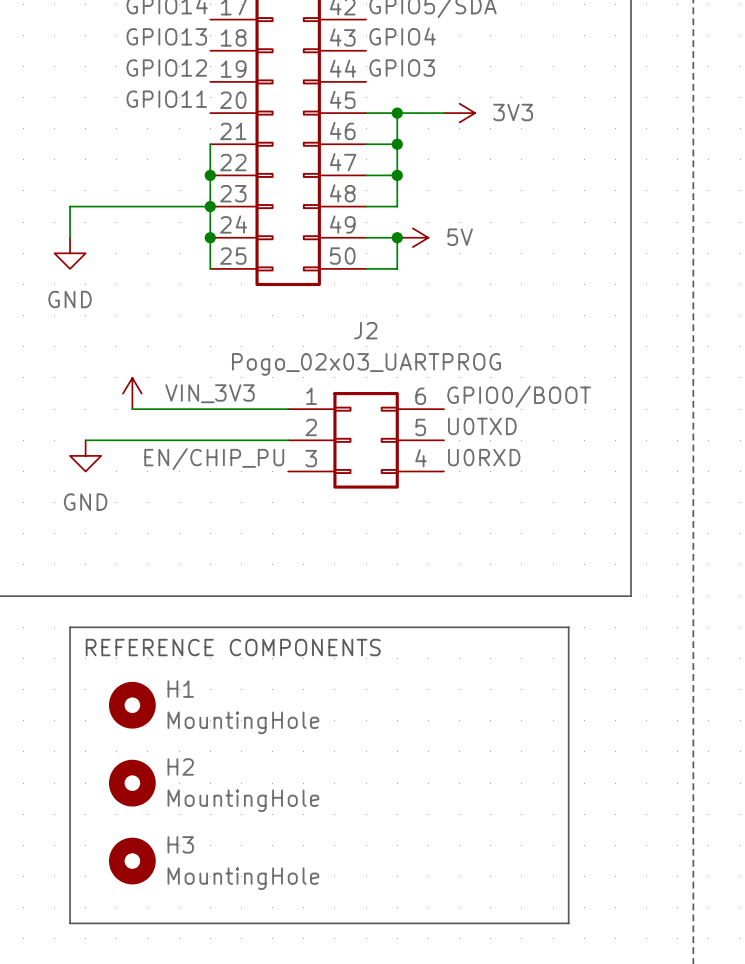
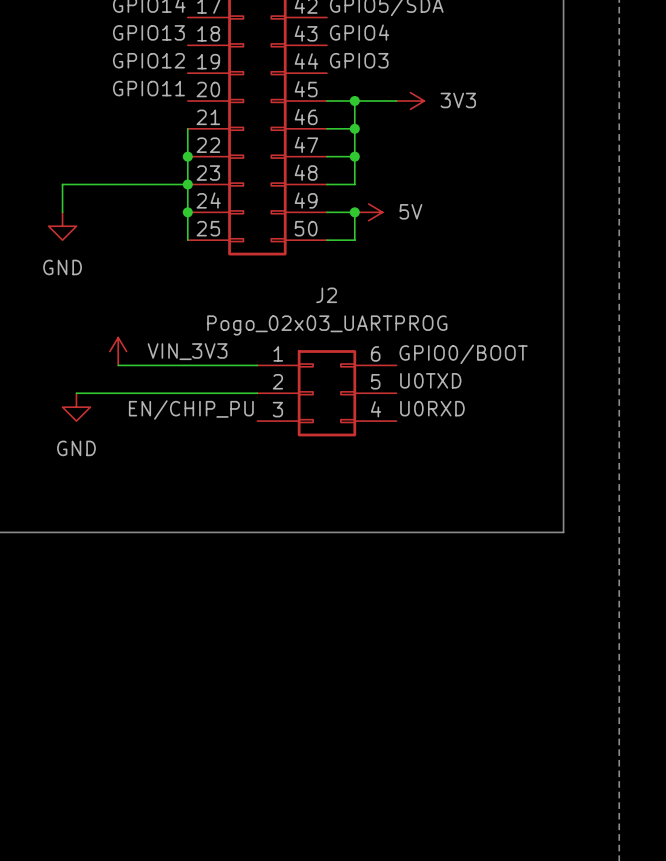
line: (70, 627) (568, 627) (568, 923) (70, 923) (70, 627) -> none
text: REFERENCE COMPONENTS (233, 647) -> none
H1: MountingHole (132, 705) -> none
H2: MountingHole (132, 783) -> none
H3: MountingHole (132, 861) -> none

